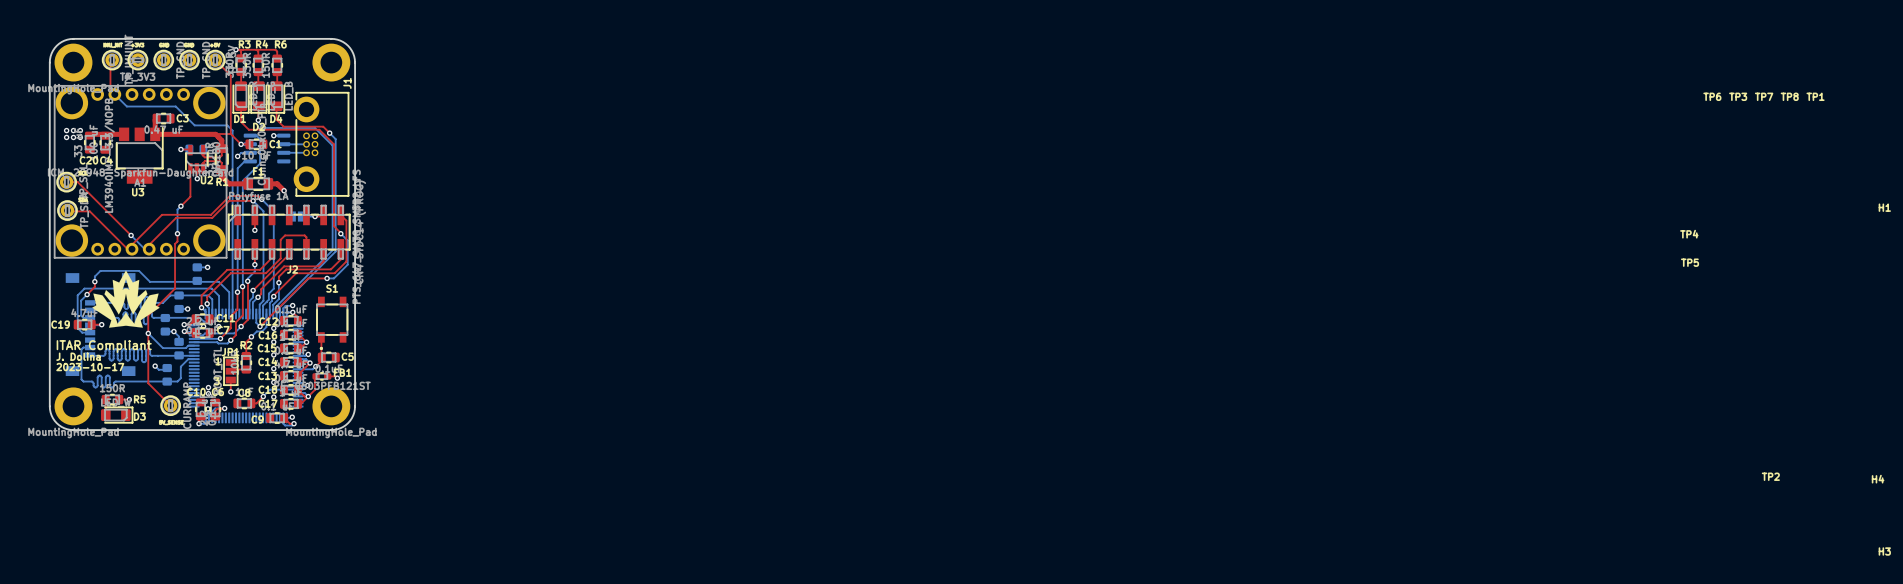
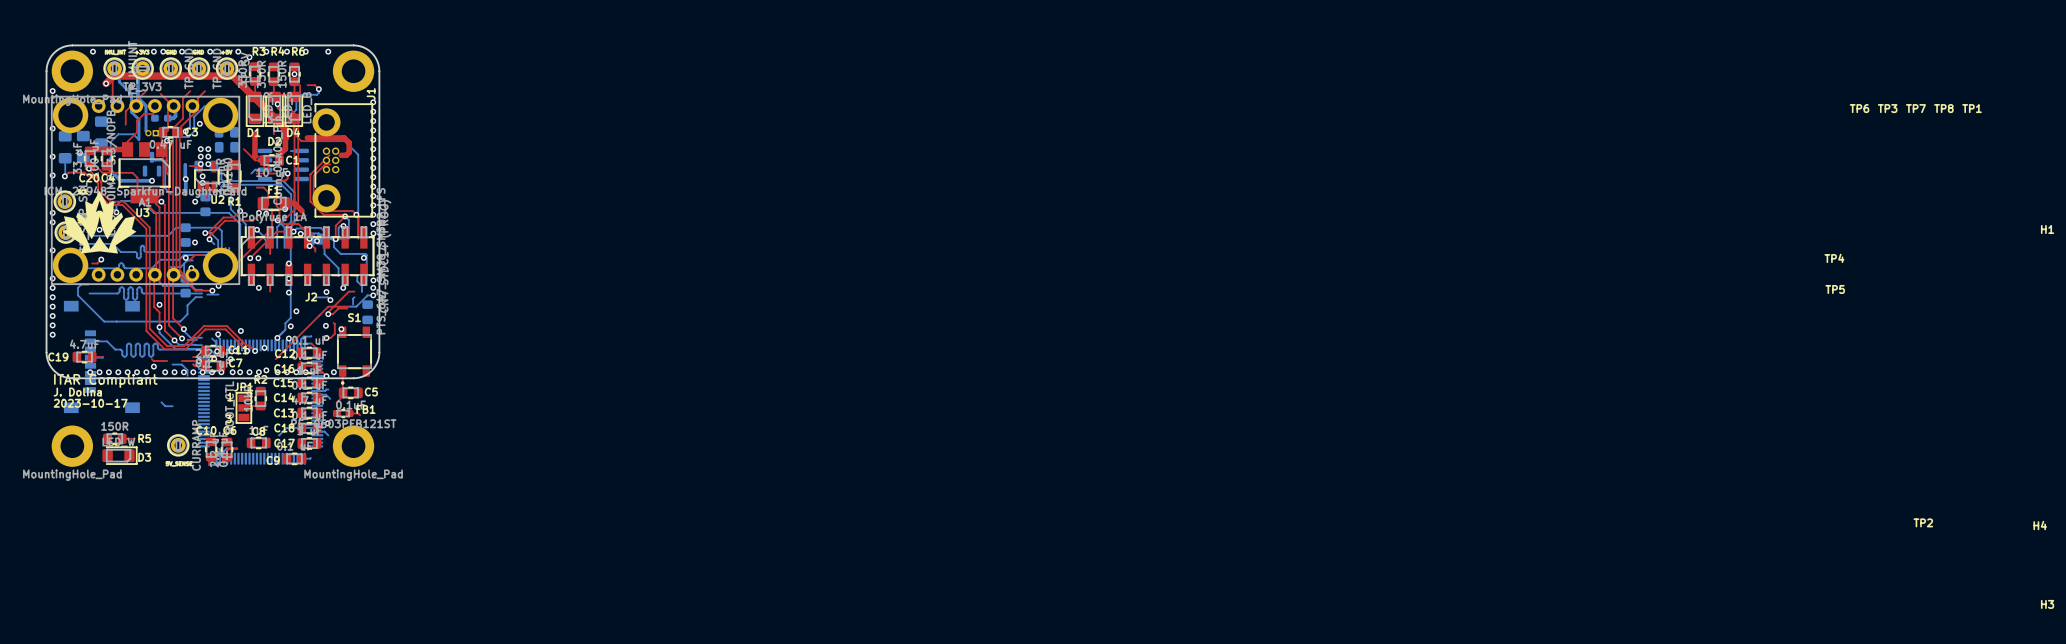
via: none -> (92, 51)
via: none -> (153, 51)
via: none -> (163, 51)
via: none -> (182, 51)
via: none -> (210, 51)
via: none -> (238, 51)
via: none -> (266, 51)
via: none -> (287, 51)
via: none -> (305, 51)
via: none -> (328, 51)
top track: (235, 49) (275, 49) (277, 58) -> none
top track: (239, 49) (241, 58) -> none
top track: (256, 49) (258, 58) -> none
top track: (215, 60) (230, 75) (230, 134) (215, 134) -> none
bottom track: none -> (119, 74) (119, 81) (131, 93) (131, 112) (138, 119) (138, 139) (133, 134) (118, 134) (110, 141) (110, 157) (108, 159)
bottom track: none -> (137, 74) (137, 97) (145, 105) (145, 130) (148, 133)
via: none -> (294, 74)
top track: none -> (106, 83) (113, 76) (232, 76) (285, 128) (285, 148) (277, 156) (268, 158) (268, 172) (276, 173)
via: none -> (106, 83)
top track: none -> (300, 85) (298, 94) (281, 94) (277, 98) (277, 107) (279, 110) (291, 110) (298, 117) (298, 206) (285, 218)
top track: none -> (307, 85) (314, 85) (318, 89)
bottom track: none -> (318, 89) (317, 94) (300, 94) (296, 98) (296, 109) (290, 115) (288, 115) (289, 104)
via: none -> (318, 89)
via: none -> (52, 91)
top track: none -> (145, 91) (125, 111) (125, 124)
top track: none -> (190, 91) (182, 98) (182, 118) (173, 128) (173, 318) (183, 329)
top track: none -> (205, 91) (197, 98) (197, 109) (176, 131) (176, 271) (195, 290) (212, 290)
top track: none -> (160, 94) (167, 101) (167, 130) (161, 136) (163, 192) (156, 199) (156, 203) (159, 207) (159, 282)
via: none -> (373, 102)
via: none -> (277, 104)
bottom track: (114, 94) (126, 106) (175, 106) (194, 125) (227, 125) (232, 130) (232, 313) -> none
top track: none -> (160, 105) (152, 113) (144, 113) (137, 121) (137, 132) (125, 143)
bottom track: none -> (175, 105) (175, 116) (167, 118)
bottom track: none -> (205, 105) (194, 116) (194, 131) (188, 136) (170, 136) (167, 140)
bottom track: none -> (189, 106) (189, 127) (185, 131)
via: none -> (373, 111)
top track: none -> (288, 115) (294, 121) (294, 199) (285, 209)
part: none -> (161, 118)
top track: (241, 106) (241, 121) (248, 129) (319, 129) (333, 144) (333, 226) (340, 233) -> none
via: none -> (373, 121)
via: none -> (199, 123)
via: none -> (52, 128)
via: none -> (373, 130)
top track: none -> (185, 131) (179, 137) (179, 270) (193, 284) (216, 284) (218, 285)
via: none -> (185, 131)
part: none -> (101, 132)
top track: (156, 118) (155, 134) (215, 134) -> none
part: none -> (226, 132)
part: none -> (152, 133)
top track: none -> (254, 134) (254, 156) (264, 158) (264, 172) (256, 173)
bottom track: (258, 120) (264, 127) (315, 127) (332, 145) (332, 250) (276, 305) (276, 313) -> none
via: (258, 120) -> none
top track: none -> (307, 137) (344, 137) (349, 142) (349, 152) (346, 155) (341, 155)
via: none -> (373, 139)
top track: none -> (167, 140) (166, 173) (168, 175) (168, 325) (182, 338)
via: none -> (167, 140)
via: (66, 130) -> none
via: (73, 130) -> none
via: (80, 130) -> none
part: none -> (65, 147)
part: none -> (83, 147)
part: none -> (226, 147)
via: (329, 133) -> none
via: none -> (200, 149)
via: none -> (208, 149)
top track: (215, 134) (221, 140) (221, 155) (219, 157) (204, 157) (203, 150) -> none
via: none -> (373, 149)
bottom track: (250, 135) (256, 135) (260, 139) (260, 163) (242, 180) (242, 286) -> none
via: (273, 135) -> none
via: (66, 137) -> none
via: (73, 137) -> none
top track: none -> (329, 155) (310, 174) (310, 201) (323, 214) (345, 216) (335, 225) (335, 237)
via: none -> (52, 156)
via: none -> (200, 156)
via: none -> (208, 156)
bottom track: none -> (152, 157) (155, 160) (167, 160) (165, 162) (165, 188) (171, 194)
bottom track: none -> (65, 158) (64, 176)
via: none -> (373, 158)
via: (241, 144) -> none
bottom track: (283, 144) (306, 144) -> none
part: none -> (152, 164)
via: none -> (200, 164)
via: none -> (208, 164)
bottom track: none -> (185, 164) (185, 194)
top track: none -> (330, 164) (325, 164) (313, 175) (313, 200) (324, 211) (352, 211) (358, 216) (358, 237)
top track: none -> (95, 166) (102, 172) (132, 172) (137, 177) (137, 194) (156, 213) (154, 306) (157, 310)
via: (180, 149) -> none
top track: none -> (89, 168) (101, 181) (101, 192) (110, 201) (123, 201) (149, 227) (149, 328) (167, 346) (184, 346) (204, 326) (227, 326) (246, 345) (249, 345) (255, 351)
via: none -> (89, 168)
via: none -> (373, 167)
bottom track: none -> (108, 168) (120, 180) (152, 180)
bottom track: none -> (221, 169) (221, 179) (223, 181) (283, 181) (294, 192) (294, 223) (288, 229) (288, 247)
bottom track: (283, 152) (306, 152) -> none
via: (237, 156) -> none
top track: none -> (287, 173) (285, 180) (276, 180)
via: none -> (287, 173)
via: none -> (52, 175)
top track: none -> (64, 176) (68, 172) (84, 172) (90, 175) (98, 183) (98, 193) (109, 204) (122, 204) (146, 228) (146, 331) (164, 349) (185, 349) (205, 329) (225, 329) (247, 350)
via: none -> (64, 176)
via: none -> (202, 176)
via: none -> (373, 177)
via: none -> (185, 179)
bottom track: (250, 161) (244, 161) (237, 168) (237, 292) -> none
via: none -> (152, 180)
via: none -> (202, 182)
top track: (190, 168) (190, 196) (180, 206) -> none
top track: (203, 168) (204, 161) (220, 161) (221, 162) (221, 176) (229, 183) (248, 183) -> none
via: none -> (373, 186)
top track: none -> (256, 187) (263, 187) (268, 192) (266, 213) (266, 207) (260, 201)
top track: none -> (276, 187) (276, 206) (279, 209) (279, 219) (283, 224) (298, 224) (307, 233) (311, 233) (317, 241)
via: none -> (373, 196)
bottom track: none -> (221, 196) (221, 186) (223, 184) (281, 184) (291, 194) (291, 221) (284, 228) (284, 247)
bottom track: none -> (230, 196) (230, 209) (245, 224) (245, 235)
via: (197, 178) -> none
top track: (66, 182) (77, 182) (131, 235) -> none
top track: none -> (161, 201) (164, 205) (164, 330) (174, 340)
via: none -> (161, 201)
via: none -> (195, 201)
part: none -> (205, 204)
via: none -> (373, 205)
top track: none -> (272, 209) (272, 228) (236, 263)
via: none -> (285, 209)
top track: none -> (240, 211) (233, 217) (223, 217) (208, 233) (205, 233)
via: none -> (240, 211)
via: (284, 190) -> none
bottom track: none -> (116, 212) (116, 205) (120, 200) (142, 200) (153, 212) (228, 212) (240, 224) (240, 247)
via: none -> (116, 212)
via: none -> (52, 212)
top track: none -> (258, 212) (252, 220) (224, 220) (209, 236) (209, 239)
via: none -> (258, 212)
via: none -> (266, 213)
via: none -> (356, 214)
via: none -> (373, 214)
top track: none -> (305, 215) (299, 215) (290, 224)
bottom track: none -> (345, 216) (348, 220) (348, 238)
via: none -> (345, 216)
bottom track: none -> (285, 218) (277, 227) (277, 247)
top track: (261, 199) (258, 195) (229, 195) (211, 214) (162, 214) (132, 244) (132, 249) (127, 249) (89, 211) (67, 210) -> none
top track: (253, 200) (229, 200) (212, 217) (176, 217) (149, 244) (149, 249) -> none
bottom track: (253, 200) (263, 211) (263, 300) (259, 304) (259, 313) -> none
via: (253, 200) -> none
via: none -> (52, 222)
via: none -> (373, 224)
bottom track: none -> (343, 226) (338, 227) (338, 239)
via: none -> (343, 226)
bottom track: (180, 206) (177, 209) (177, 233) -> none
via: (180, 206) -> none
via: none -> (99, 229)
bottom track: none -> (257, 229) (266, 240) (266, 247)
via: none -> (257, 229)
top track: none -> (293, 231) (276, 231) (250, 258)
bottom track: none -> (293, 231) (296, 228) (320, 227) (333, 241) (333, 247) (340, 253) (365, 253) (366, 276)
via: none -> (293, 231)
bottom track: none -> (205, 233) (210, 233) (218, 240) (218, 247)
via: none -> (205, 233)
bottom track: none -> (300, 233) (318, 233) (324, 239) (324, 254) (338, 268) (338, 276)
via: none -> (300, 233)
via: none -> (373, 233)
part: none -> (185, 235)
bottom track: none -> (88, 235) (117, 235) (121, 229) (125, 235) (168, 235) (176, 227) (218, 227) (221, 231) (221, 247)
top track: (340, 215) (346, 220) (346, 261) (334, 273) (296, 273) (273, 296) -> none
bottom track: none -> (209, 239) (214, 244)
via: none -> (209, 239)
via: none -> (309, 238)
bottom track: (335, 216) (335, 251) (279, 307) (279, 313) -> none
via: none -> (317, 241)
via: none -> (195, 242)
bottom track: none -> (88, 243) (112, 243) (120, 252) (136, 252) (138, 258) (142, 245) (146, 252) (208, 252) (212, 256) (223, 256) (225, 247)
top track: none -> (309, 246) (312, 246) (315, 251)
via: none -> (309, 246)
bottom track: none -> (229, 247) (229, 254) (224, 259) (212, 259) (207, 255) (183, 255) (179, 259) (160, 259) (151, 268) (125, 268) (121, 263) (117, 268) (88, 268)
via: none -> (52, 250)
via: (254, 230) -> none
top track: none -> (203, 254) (195, 254) (190, 260)
top track: (177, 233) (177, 241) (175, 243) (175, 288) (148, 315) (148, 383) (170, 405) -> none
bottom track: (340, 233) (347, 240) (347, 264) (344, 268) -> (373, 295) (367, 295)
via: none -> (250, 258)
via: none -> (258, 258)
top track: none -> (101, 259) (97, 263) (92, 263)
via: none -> (101, 259)
bottom track: (131, 235) (144, 249) (149, 249) -> none
via: (131, 235) -> none
bottom track: none -> (192, 260) (187, 260) (180, 267) (170, 267)
bottom track: none -> (184, 263) (185, 278)
via: none -> (288, 263)
via: none -> (191, 268)
top track: (272, 249) (272, 257) (260, 269) (227, 269) (201, 295) (201, 307) -> none
top track: (289, 249) (289, 254) (253, 290) -> none
top track: (306, 249) (304, 235) (285, 235) (280, 239) (280, 258) (265, 273) (230, 273) (207, 296) (207, 303) -> none
top track: (323, 249) (323, 261) (318, 266) (284, 266) (261, 289) (261, 294) (258, 297) -> none
top track: (340, 249) (340, 259) (330, 269) (286, 269) (278, 276) (278, 282) -> none
bottom track: none -> (357, 276) (357, 281) (361, 286) (361, 291)
via: none -> (52, 278)
via: none -> (288, 278)
via: none -> (373, 280)
bottom track: none -> (159, 282) (163, 286) (191, 286) (195, 289) (202, 289)
bottom track: none -> (88, 284) (81, 284) (77, 287) (77, 295) (104, 321) (180, 321) (187, 314) (187, 305) (195, 297) (202, 297)
part: none -> (185, 285)
via: none -> (218, 285)
via: none -> (52, 287)
via: none -> (258, 287)
via: none -> (343, 287)
via: none -> (373, 287)
via: none -> (212, 290)
bottom track: (254, 264) (254, 271) (247, 278) (247, 281) -> none
via: (254, 264) -> none
top track: none -> (354, 291) (348, 291) (328, 314) (332, 314) (338, 308) (346, 308) (344, 306)
via: none -> (288, 292)
via: none -> (326, 292)
bottom track: none -> (89, 293) (117, 293) (122, 287) (123, 289) (124, 298) (126, 299) (128, 297) (128, 288) (130, 287) (132, 289) (132, 298) (135, 299) (137, 298) (137, 289) (139, 287) (143, 293) (202, 293)
via: (207, 267) -> none
via: none -> (373, 295)
via: none -> (52, 297)
bottom track: none -> (315, 297) (327, 297) (330, 300)
bottom track: none -> (354, 297) (353, 304)
via: none -> (330, 300)
part: (197, 274) -> none
via: none -> (159, 304)
via: none -> (52, 306)
via: (327, 278) -> none
top track: (94, 281) (94, 286) (87, 294) -> none
bottom track: (94, 281) (94, 276) (100, 270) (139, 270) (150, 281) (218, 281) (229, 292) (229, 313) -> none
via: (94, 281) -> none
top track: none -> (157, 310) (159, 312) (159, 327)
top track: (247, 281) (247, 319) (241, 326) -> none
via: (247, 281) -> none
bottom track: (278, 282) (278, 299) (273, 304) (273, 313) -> none
part: none -> (367, 312)
via: none -> (328, 314)
top track: (242, 286) (242, 315) (235, 322) (235, 335) (230, 340) -> none
via: (242, 286) -> none
via: none -> (52, 316)
bottom track: (253, 290) (253, 297) (249, 300) (249, 313) -> none
via: (253, 290) -> none
top track: (237, 292) (237, 309) (230, 316) (230, 328) (220, 338) -> none
via: (237, 292) -> none
top track: none -> (333, 322) (334, 333) (330, 337) (326, 337)
bottom track: (87, 294) (81, 300) (81, 315) (83, 317) (90, 317) -> none
via: (87, 294) -> none
via: none -> (52, 325)
bottom track: (273, 296) (269, 303) (269, 313) -> none
via: none -> (325, 325)
bottom track: none -> (159, 327) (159, 332) (175, 348) (202, 348)
via: none -> (159, 327)
bottom track: (258, 297) (252, 302) (252, 313) -> none
via: (258, 297) -> none
drawing position: (125, 299) -> (99, 222)
bottom track: none -> (183, 329) (190, 337) (202, 337)
via: none -> (183, 329)
via: none -> (341, 329)
via: none -> (240, 331)
bottom track: (90, 302) (122, 302) (126, 308) (128, 298) (130, 296) (132, 307) (134, 308) (136, 298) (138, 296) (140, 307) (142, 308) (144, 298) (146, 296) (150, 308) (153, 303) (163, 302) (170, 295) (208, 295) (212, 299) (212, 313) -> none
part: (179, 302) -> none
via: none -> (52, 334)
via: (292, 305) -> none
via: none -> (182, 338)
via: (201, 307) -> none
via: none -> (277, 337)
via: none -> (288, 338)
via: none -> (326, 337)
via: (187, 308) -> none
bottom track: none -> (174, 340) (178, 344) (202, 345)
via: none -> (174, 340)
via: (292, 312) -> none
bottom track: (219, 313) (219, 295) (211, 288) (84, 288) (77, 295) (77, 328) (82, 332) (90, 332) -> none
bottom track: (256, 313) (256, 322) (260, 326) -> none
bottom track: (266, 313) (266, 327) (262, 331) (256, 331) (251, 336) -> none
via: none -> (264, 347)
via: none -> (217, 351)
via: none -> (235, 350)
via: none -> (247, 350)
via: none -> (255, 351)
board edge: (49, 320) (50, 412) (59, 425) (73, 430) (331, 430) (340, 428) (350, 420) (354, 409) (355, 320) -> (46, 352) (49, 363) (54, 370) (63, 376) (72, 378) (356, 378) (367, 374) (373, 368) (379, 352)
via: (101, 324) -> none
part: (165, 324) -> none
via: (184, 324) -> none
top track: none -> (151, 359) (153, 361) (167, 361)
bottom track: (241, 326) (234, 333) (194, 335) -> none
via: (241, 326) -> none
via: (260, 326) -> none
top track: none -> (209, 359) (182, 361)
via: none -> (198, 361)
via: (273, 328) -> none
top track: none -> (300, 361) (304, 365) (315, 364)
via: (173, 331) -> none
via: (184, 331) -> none
bottom track: (148, 333) (162, 348) (185, 348) (188, 345) (194, 345) -> none
top track: (251, 336) (246, 342) (246, 359) -> none
via: none -> (90, 372)
via: none -> (99, 372)
via: none -> (108, 372)
via: none -> (118, 372)
via: none -> (127, 372)
via: none -> (137, 372)
via: none -> (146, 372)
via: none -> (165, 372)
via: none -> (174, 372)
via: none -> (183, 372)
via: none -> (193, 372)
via: none -> (202, 372)
via: none -> (212, 372)
via: none -> (221, 372)
bottom track: (220, 338) (194, 338) -> none
via: none -> (240, 372)
via: none -> (249, 372)
via: none -> (258, 372)
via: none -> (277, 372)
via: none -> (287, 372)
via: none -> (296, 372)
via: none -> (305, 372)
via: none -> (333, 372)
bottom track: (230, 340) (227, 343) (194, 342) -> none
via: (230, 340) -> none
via: (273, 342) -> none
bottom track: (90, 347) (81, 349) (81, 379) (83, 381) (92, 381) (95, 387) (97, 386) (99, 375) (101, 376) (103, 387) (105, 386) (107, 375) (109, 376) (111, 387) (115, 381) (177, 381) (180, 378) (180, 366) (188, 359) (194, 359) -> none
part: (179, 348) -> none
bottom track: (90, 354) (103, 355) (108, 349) (109, 359) (112, 360) (113, 350) (115, 349) (117, 359) (119, 360) (121, 350) (124, 349) (125, 359) (128, 360) (130, 350) (132, 349) (134, 359) (136, 360) (138, 350) (140, 349) (144, 362) (147, 349) (151, 355) (194, 355) -> none
via: (273, 354) -> none
via: (308, 354) -> none
top track: (297, 362) (309, 363) (297, 375) -> none
via: (309, 363) -> none
via: (155, 366) -> none
bottom track: (315, 366) (312, 369) (298, 369) -> none
via: (315, 366) -> none
via: (273, 368) -> none
part: (167, 374) -> none
top track: (314, 376) (314, 389) (300, 403) (297, 403) -> none
via: (337, 378) -> none
top track: (230, 380) (230, 391) -> none
via: (273, 382) -> none
via: (208, 387) -> none
top track: (297, 389) (304, 396) (308, 396) -> none
via: (230, 391) -> none
via: (208, 393) -> none
top track: (263, 396) (256, 403) (251, 403) -> none
via: (263, 396) -> none
via: (308, 396) -> none
via: (273, 397) -> none
via: (129, 399) -> none
via: (208, 408) -> none
via: (224, 408) -> none
bottom track: (283, 417) (285, 425) (294, 423) -> none
via: (292, 417) -> none
top track: (284, 418) (289, 423) (294, 423) -> none
via: (199, 423) -> none
via: (294, 423) -> none

